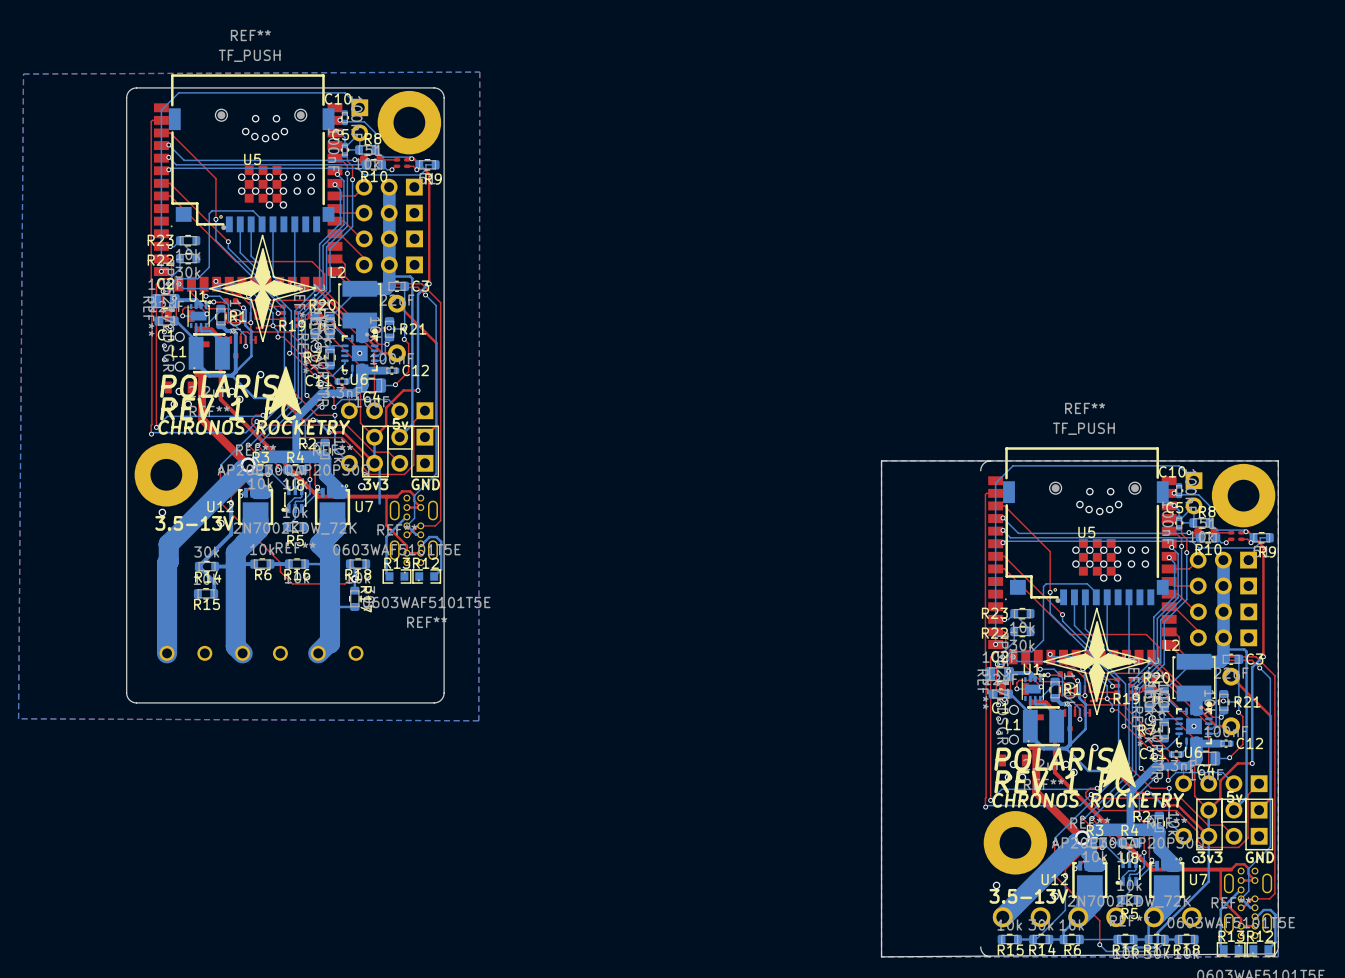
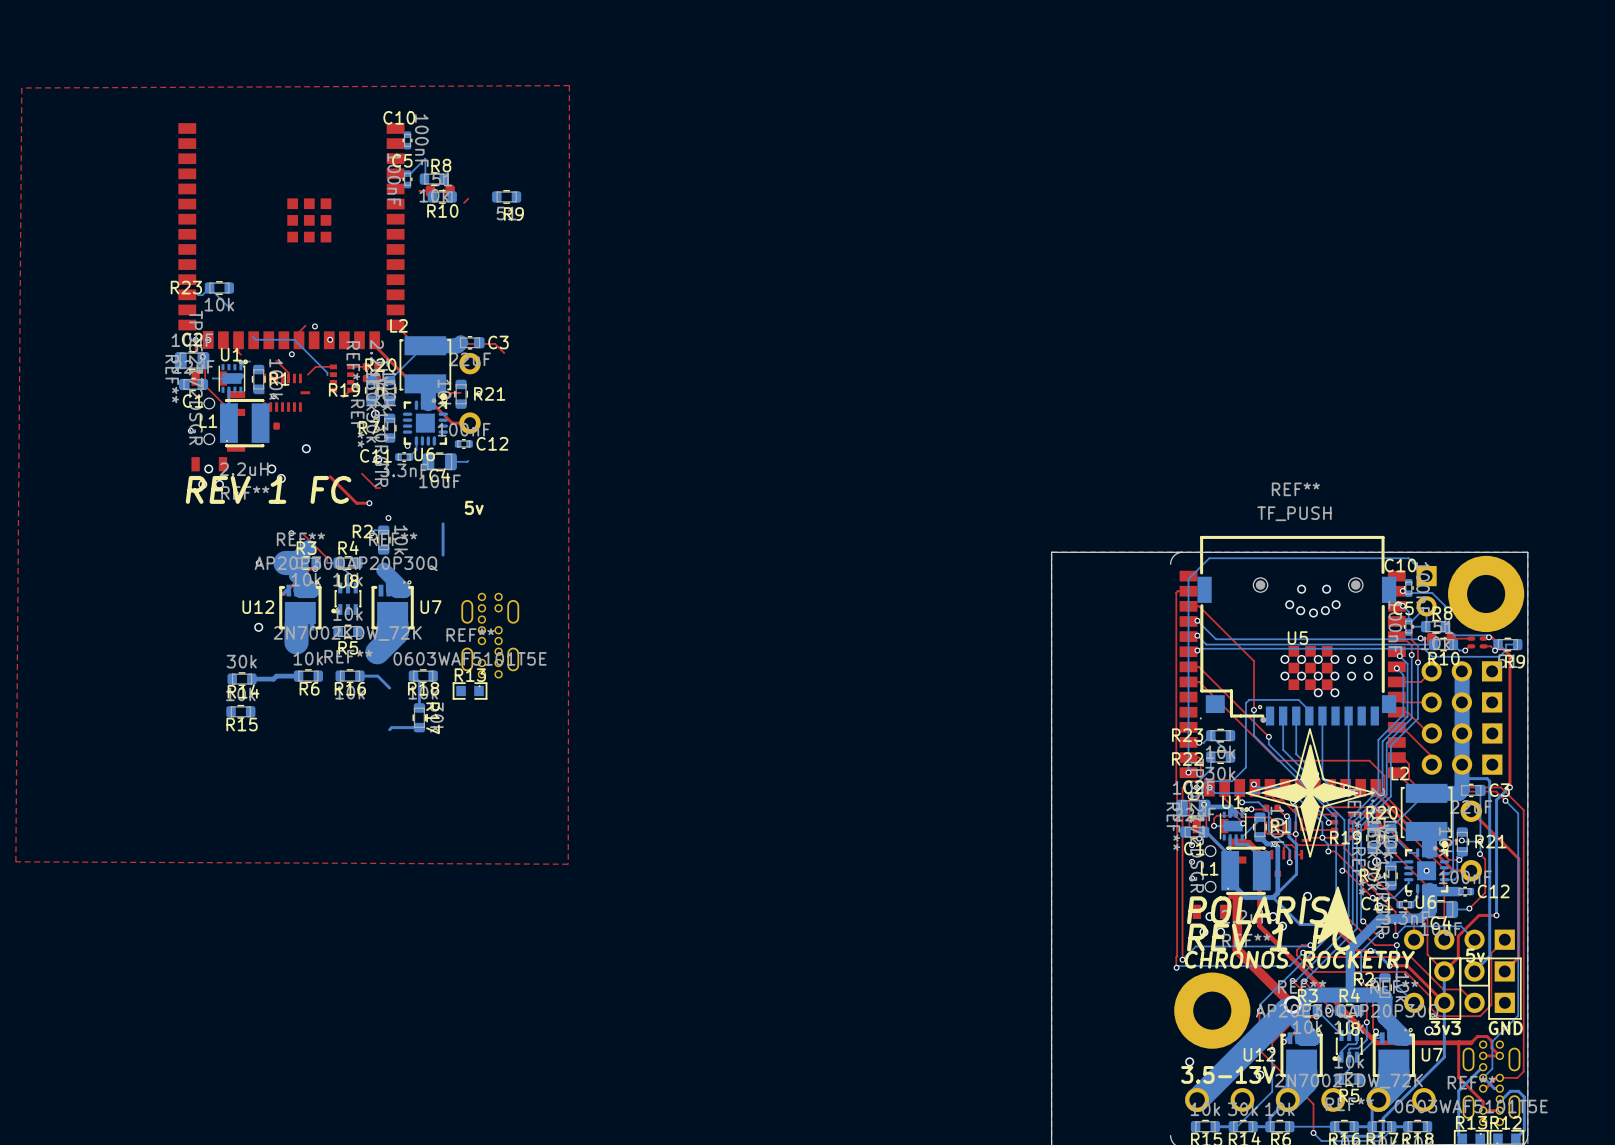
bottom zone outline: (479, 72) (23, 74) (18, 718) (478, 720) (479, 72) -> none
board edge: (434, 87) (136, 87) (131, 89) (127, 93) (126, 693) (128, 698) (132, 701) (434, 702) (439, 701) (443, 697) (444, 97) (441, 90) (434, 87) -> none
bottom track: (359, 107) (344, 92) (178, 92) (161, 110) (161, 271) -> none
via: (255, 118) -> none
via: (276, 118) -> none
top track: (161, 120) (151, 121) (151, 434) -> none
via: (339, 120) -> none
part: (359, 120) -> none
bottom track: (345, 121) (364, 121) (375, 132) (375, 149) (382, 157) (410, 157) (411, 158) -> none
part: (409, 122) -> none
via: (245, 131) -> none
via: (284, 131) -> none
top track: (161, 132) (170, 132) (215, 178) (215, 219) -> none
bottom track: (339, 132) (344, 137) (344, 145) (349, 149) (359, 149) -> none
via: (339, 132) -> none
via: (254, 136) -> none
via: (275, 136) -> none
via: (265, 138) -> none
bottom track: (168, 144) (184, 160) (354, 159) -> none
via: (168, 144) -> none
top track: (334, 145) (343, 145) (347, 149) (347, 160) (352, 166) (352, 179) -> none
U5: TF_PUSH (251, 153) -> none
bottom track: (168, 157) (176, 164) (365, 164) -> none
via: (168, 157) -> none
top track: (339, 158) (347, 165) (347, 173) -> none
via: (411, 158) -> none
via: (354, 159) -> none
top track: (396, 159) (380, 159) -> none
top track: (407, 159) (413, 158) (429, 174) (429, 283) -> none
part: (402, 163) -> none
bottom track: (382, 164) (387, 169) (392, 169) -> none
bottom track: (435, 164) (425, 164) (425, 169) (420, 174) (364, 174) (357, 168) (168, 169) -> none
top track: (407, 166) (413, 166) (416, 169) -> none
via: (168, 169) -> none
via: (392, 169) -> none
via: (416, 169) -> none
bottom track: (347, 173) (347, 226) (326, 247) (326, 289) (301, 314) (301, 401) (257, 445) -> none
via: (347, 173) -> none
bottom track: (337, 174) (343, 180) (343, 224) (323, 245) (323, 288) (298, 313) (298, 397) (250, 445) (248, 445) -> none
via: (337, 174) -> none
via: (241, 177) -> none
via: (255, 177) -> none
via: (269, 177) -> none
via: (283, 177) -> none
via: (297, 177) -> none
via: (311, 177) -> none
bottom track: (352, 179) (352, 226) (330, 249) (330, 291) (305, 316) (305, 393) (306, 395) -> none
via: (352, 179) -> none
top track: (161, 183) (170, 183) (228, 241) -> none
bottom track: (334, 184) (340, 190) (340, 223) (319, 244) (319, 286) (294, 311) (294, 391) (220, 464) (220, 469) -> none
via: (334, 184) -> none
top track: (363, 187) (355, 195) (334, 195) -> none
part: (389, 187) -> none
via: (241, 191) -> none
via: (255, 191) -> none
via: (269, 191) -> none
via: (283, 191) -> none
via: (297, 191) -> none
via: (311, 191) -> none
top track: (161, 195) (170, 195) (235, 261) (312, 261) (324, 274) (324, 290) (378, 344) (387, 344) -> none
via: (269, 204) -> none
via: (283, 204) -> none
top track: (334, 208) (339, 213) (363, 213) -> none
part: (389, 213) -> none
bottom track: (215, 219) (215, 240) (284, 308) (284, 382) (289, 388) -> none
via: (215, 219) -> none
bottom track: (262, 219) (253, 210) (211, 210) (209, 213) (209, 267) (197, 278) (176, 278) (173, 281) (173, 287) (169, 291) (163, 291) -> none
top track: (334, 221) (343, 221) (361, 238) -> none
bottom track: (240, 224) (240, 252) (259, 272) -> none
bottom track: (251, 224) (251, 256) (267, 272) -> none
bottom track: (272, 224) (272, 276) (280, 283) -> none
bottom track: (294, 224) (294, 281) (292, 283) -> none
top track: (339, 233) (364, 258) -> none
part: (389, 238) -> none
bottom track: (228, 241) (228, 248) (291, 311) (291, 351) (289, 353) -> none
via: (228, 241) -> none
via: (170, 246) -> none
drawing: [222, 248, 304, 329] -> none
top track: (161, 258) (171, 260) (171, 278) (162, 278) (156, 284) (156, 427) -> none
bottom track: (179, 258) (179, 268) (168, 280) (168, 283) -> none
R22: 30k (188, 258) -> none
top track: (339, 258) (345, 264) (345, 276) (352, 283) (421, 283) (440, 302) (440, 520) (435, 525) (417, 525) (408, 534) -> none
part: (389, 264) -> none
via: (161, 271) -> none
line: (251, 277) (262, 235) (274, 277) (315, 288) (274, 299) -> none
line: (251, 277) (209, 288) (251, 299) (262, 341) (274, 299) -> none
via: (215, 281) -> none
bottom track: (178, 283) (183, 288) (248, 288) (272, 313) (272, 326) (277, 331) (277, 337) -> none
via: (292, 283) -> none
bottom track: (429, 283) (418, 294) (418, 390) -> none
via: (429, 283) -> none
top track: (191, 284) (191, 293) (206, 308) (229, 308) (230, 316) -> none
bottom track: (389, 286) (381, 293) (381, 352) (378, 355) (374, 355) -> none
bottom track: (389, 286) (389, 278) (391, 276) (410, 276) (412, 278) (412, 424) (399, 437) -> none
bottom track: (404, 286) (404, 339) -> none
top track: (229, 289) (233, 294) (239, 294) (255, 310) (255, 316) (258, 319) (283, 319) -> none
top track: (163, 291) (162, 324) (170, 326) -> none
via: (163, 291) -> none
bottom track: (425, 294) (436, 305) (436, 473) (414, 495) (414, 518) (406, 525) -> none
via: (425, 294) -> none
bottom track: (248, 295) (250, 298) (250, 322) -> none
bottom track: (206, 296) (219, 296) (228, 304) (228, 320) (245, 336) (245, 346) -> none
via: (206, 296) -> none
bottom track: (175, 300) (196, 300) (196, 306) -> none
bottom track: (196, 300) (200, 306) -> none
top track: (213, 301) (225, 302) -> none
via: (213, 301) -> none
part: (230, 301) -> none
top track: (248, 303) (251, 300) (323, 300) (374, 351) (374, 410) -> none
top track: (396, 303) (436, 343) (436, 425) (424, 437) -> none
bottom track: (243, 307) (245, 310) (245, 325) (251, 331) (251, 356) (235, 371) -> none
via: (243, 307) -> none
bottom track: (220, 310) (206, 325) -> none
top track: (207, 313) (200, 307) (185, 307) (182, 309) (182, 315) -> none
via: (207, 313) -> none
via: (278, 313) -> none
via: (182, 315) -> none
top track: (250, 316) (249, 322) (227, 322) (225, 316) -> none
top track: (250, 316) (250, 329) (253, 331) (291, 331) (291, 334) (349, 392) (349, 410) -> none
top track: (310, 316) (360, 366) (360, 423) (374, 437) (386, 425) (386, 407) (403, 390) (418, 390) -> none
top track: (310, 316) (307, 319) (297, 319) -> none
top track: (319, 316) (325, 316) (359, 350) (359, 353) -> none
bottom track: (176, 321) (196, 340) -> none
via: (250, 322) -> none
bottom track: (201, 325) (201, 331) (210, 331) (222, 343) -> none
bottom track: (220, 325) (226, 330) (233, 330) (235, 333) (235, 371) -> none
via: (272, 325) -> none
top track: (283, 325) (261, 325) (259, 327) -> none
via: (170, 326) -> none
bottom track: (389, 328) (404, 328) -> none
via: (389, 328) -> none
top track: (202, 329) (211, 329) (220, 338) (220, 399) (317, 496) (396, 496) (402, 491) (410, 491) (414, 495) (414, 500) (420, 507) (406, 507) -> none
via: (164, 331) -> none
bottom track: (315, 334) (323, 326) (333, 326) (345, 338) (352, 338) -> none
bottom track: (330, 334) (330, 349) (333, 345) (344, 345) -> none
top track: (277, 337) (283, 337) (333, 387) (333, 407) -> none
via: (277, 337) -> none
top track: (255, 339) (250, 339) (250, 334) (247, 331) (240, 334) (240, 339) -> none
top track: (404, 339) (408, 343) (408, 371) (395, 384) -> none
via: (404, 339) -> none
bottom track: (387, 344) (389, 337) (385, 341) (385, 358) (383, 360) (374, 360) -> none
via: (387, 344) -> none
via: (164, 345) -> none
via: (245, 346) -> none
top track: (289, 353) (292, 353) (314, 375) -> none
via: (289, 353) -> none
via: (359, 353) -> none
bottom track: (344, 360) (344, 363) (332, 375) (314, 375) -> none
bottom track: (196, 362) (209, 375) (231, 375) -> none
drawing: [268, 366, 302, 415] -> none
bottom track: (387, 370) (362, 369) (362, 385) (354, 392) (321, 393) (296, 418) (296, 456) (262, 456) (322, 456) (325, 458) (325, 475) -> none
bottom track: (235, 371) (231, 375) -> none
top track: (202, 374) (202, 419) (248, 464) -> none
bottom track: (231, 375) (254, 398) (280, 398) -> none
via: (314, 375) -> none
via: (395, 384) -> none
text: POLARIS (219, 386) -> none
top track: (289, 388) (316, 415) (334, 415) -> none
via: (418, 390) -> none
via: (306, 395) -> none
bottom track: (322, 407) (318, 407) (305, 420) (305, 445) -> none
via: (322, 407) -> none
bottom track: (333, 407) (341, 399) (388, 399) (399, 410) -> none
via: (333, 407) -> none
part: (387, 410) -> none
top track: (424, 410) (413, 421) (413, 465) (404, 474) (369, 474) (363, 467) (363, 458) (342, 437) (265, 437) (251, 423) (251, 419) (255, 415) (263, 415) -> none
bottom track: (263, 415) (167, 416) (156, 427) -> none
via: (263, 415) -> none
bottom track: (334, 415) (334, 448) (349, 463) -> none
via: (334, 415) -> none
bottom track: (313, 419) (316, 419) (329, 432) -> none
top track: (256, 421) (260, 425) (346, 425) (373, 452) (388, 452) (399, 463) -> none
bottom track: (256, 421) (245, 432) (151, 434) -> none
via: (256, 421) -> none
line: (411, 426) (411, 476) (438, 476) (438, 426) (362, 426) (362, 476) (387, 476) (387, 426) -> none
via: (156, 427) -> none
text: CHRONOS ROCKETRY (254, 427) -> none
top track: (329, 432) (343, 432) (374, 463) -> none
via: (151, 434) -> none
part: (399, 437) -> none
top track: (248, 445) (258, 455) (258, 469) (231, 496) (231, 502) -> none
via: (257, 445) -> none
top track: (305, 445) (309, 449) (309, 479) -> none
via: (305, 445) -> none
top track: (315, 445) (315, 484) (317, 487) -> none
line: (411, 448) (387, 448) -> none
bottom track: (374, 463) (379, 468) (379, 503) -> none
part: (387, 463) -> none
bottom track: (248, 464) (168, 544) -> none
via: (248, 464) -> none
top track: (220, 469) (220, 502) (280, 562) (280, 571) (292, 583) (344, 583) (349, 578) (354, 578) -> none
bottom track: (268, 469) (288, 489) -> none
via: (277, 469) -> none
part: (166, 474) -> none
bottom track: (309, 479) (309, 494) (302, 501) (295, 502) (295, 518) (287, 526) -> none
via: (309, 479) -> none
text: 3v3 (375, 484) -> none
text: GND (425, 484) -> none
via: (361, 486) -> none
bottom track: (317, 487) (322, 492) (317, 492) (301, 508) -> none
via: (317, 487) -> none
bottom track: (301, 490) (301, 496) (294, 497) (288, 503) (288, 508) -> none
via: (240, 495) -> none
top track: (387, 496) (386, 525) (406, 545) (406, 553) (420, 553) -> none
bottom track: (231, 502) (231, 534) (198, 566) (214, 581) (214, 593) -> none
via: (231, 502) -> none
via: (162, 512) -> none
bottom track: (406, 516) (386, 536) (386, 573) (389, 576) -> none
bottom track: (258, 521) (258, 529) (235, 552) (235, 646) (242, 653) -> none
text: 3.5-13V (194, 523) -> none
bottom track: (407, 525) (416, 534) (420, 534) -> none
bottom track: (422, 543) (429, 537) (436, 537) (441, 541) (441, 569) (434, 576) -> none
bottom track: (168, 544) (167, 653) -> none
bottom track: (320, 544) (330, 554) (330, 643) (318, 653) -> none
bottom track: (288, 564) (270, 564) -> none
R12: 0603WAF5101T5E (426, 576) -> none
via: (354, 578) -> none
part: (261, 653) -> none

